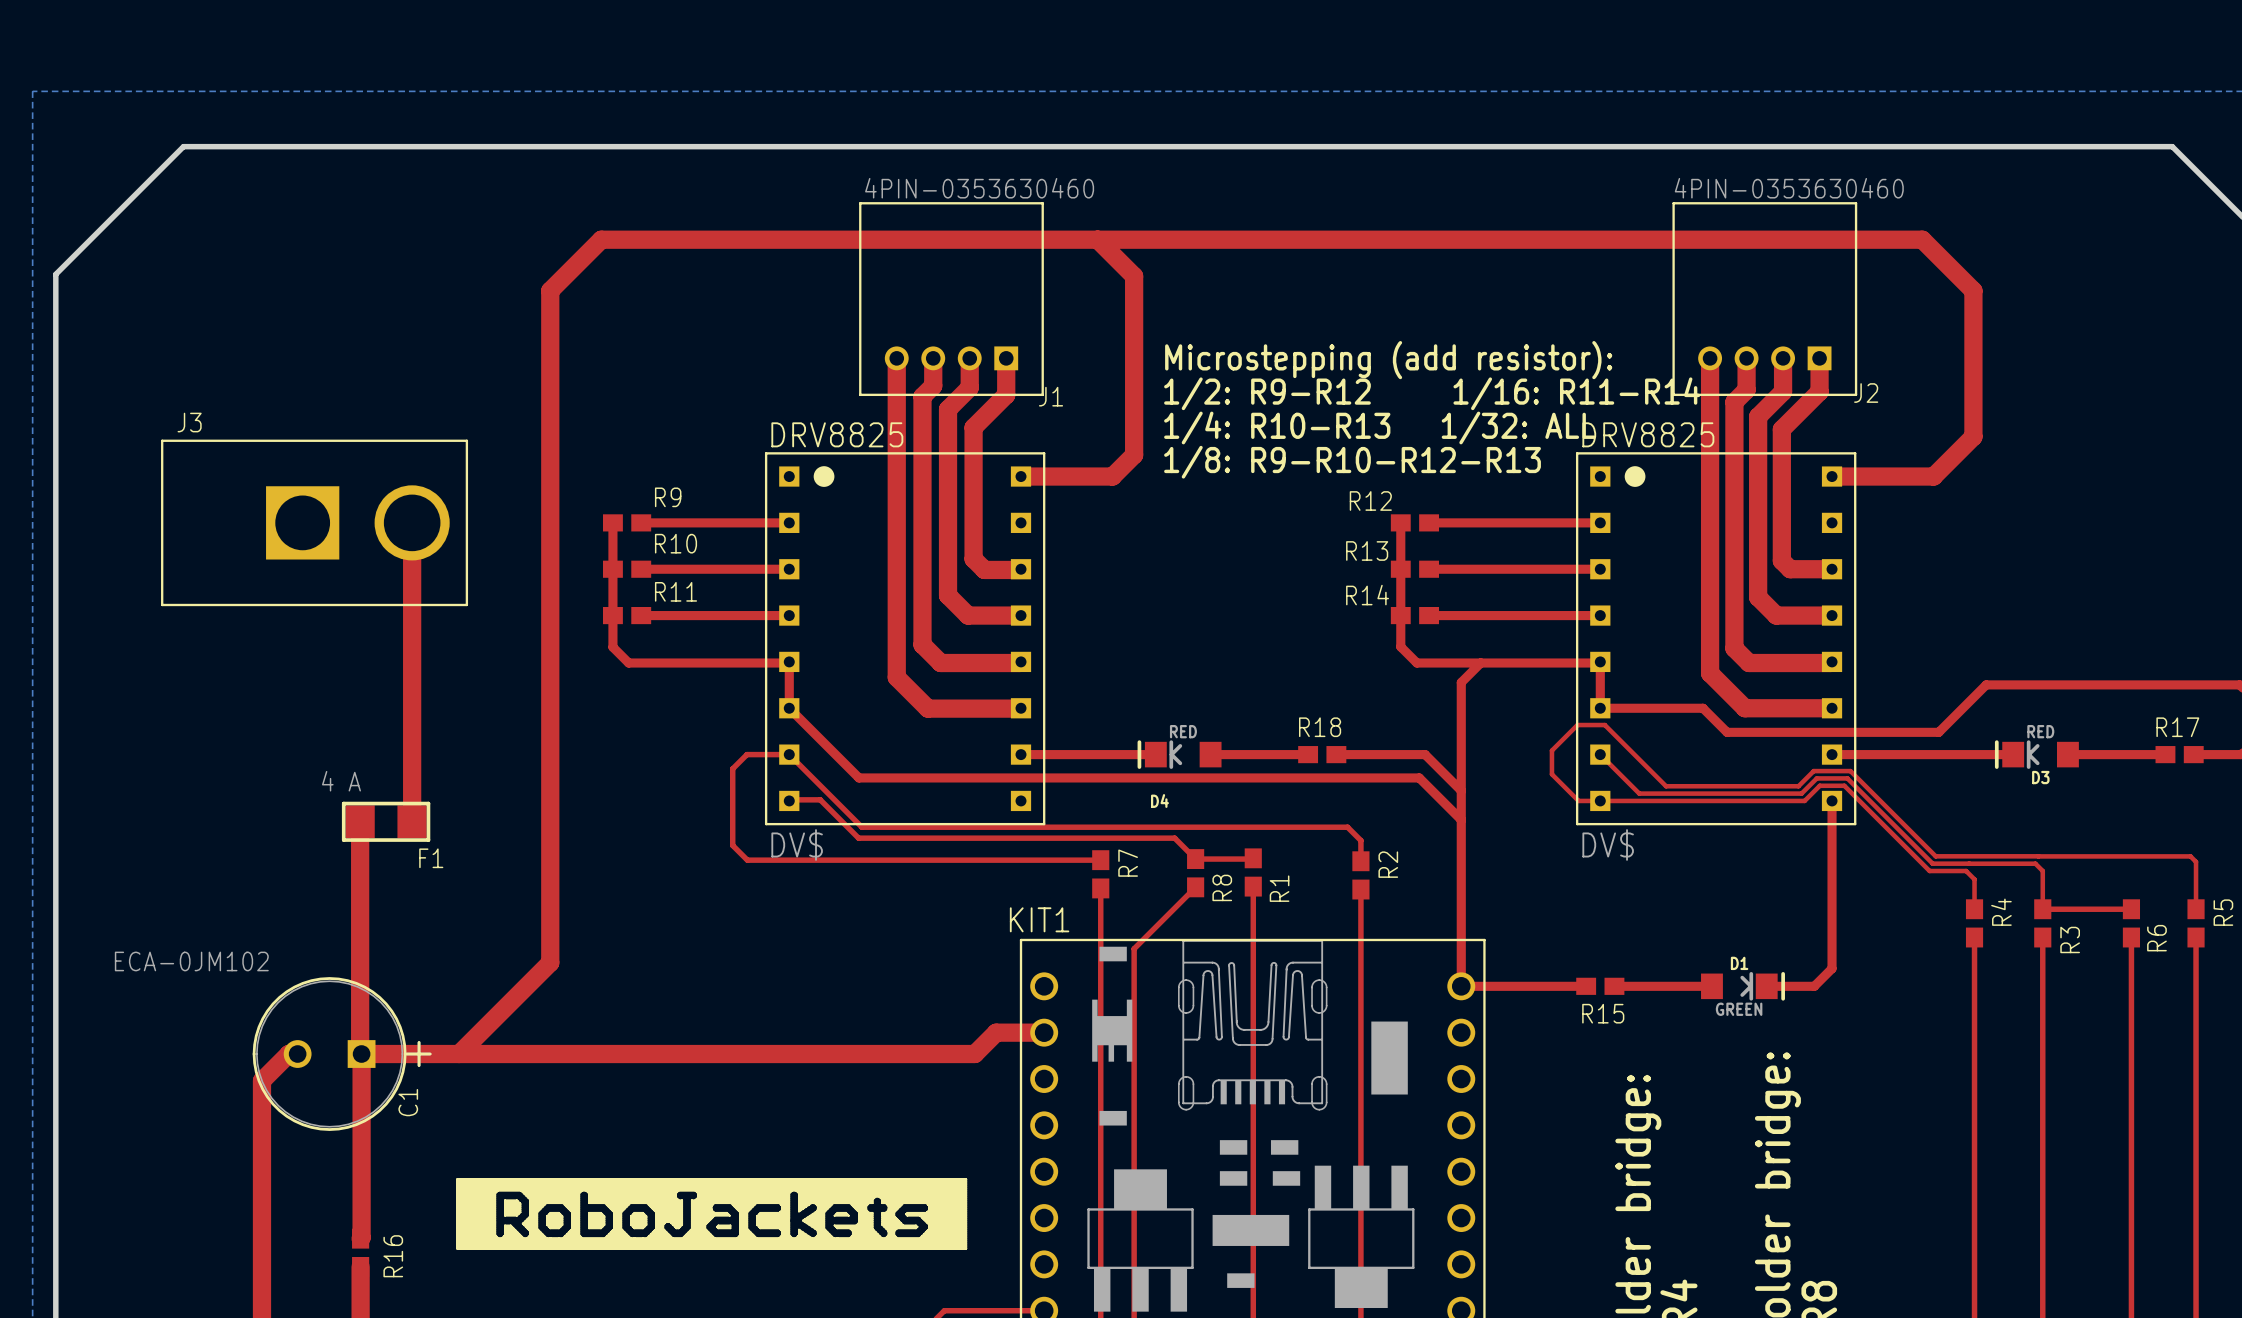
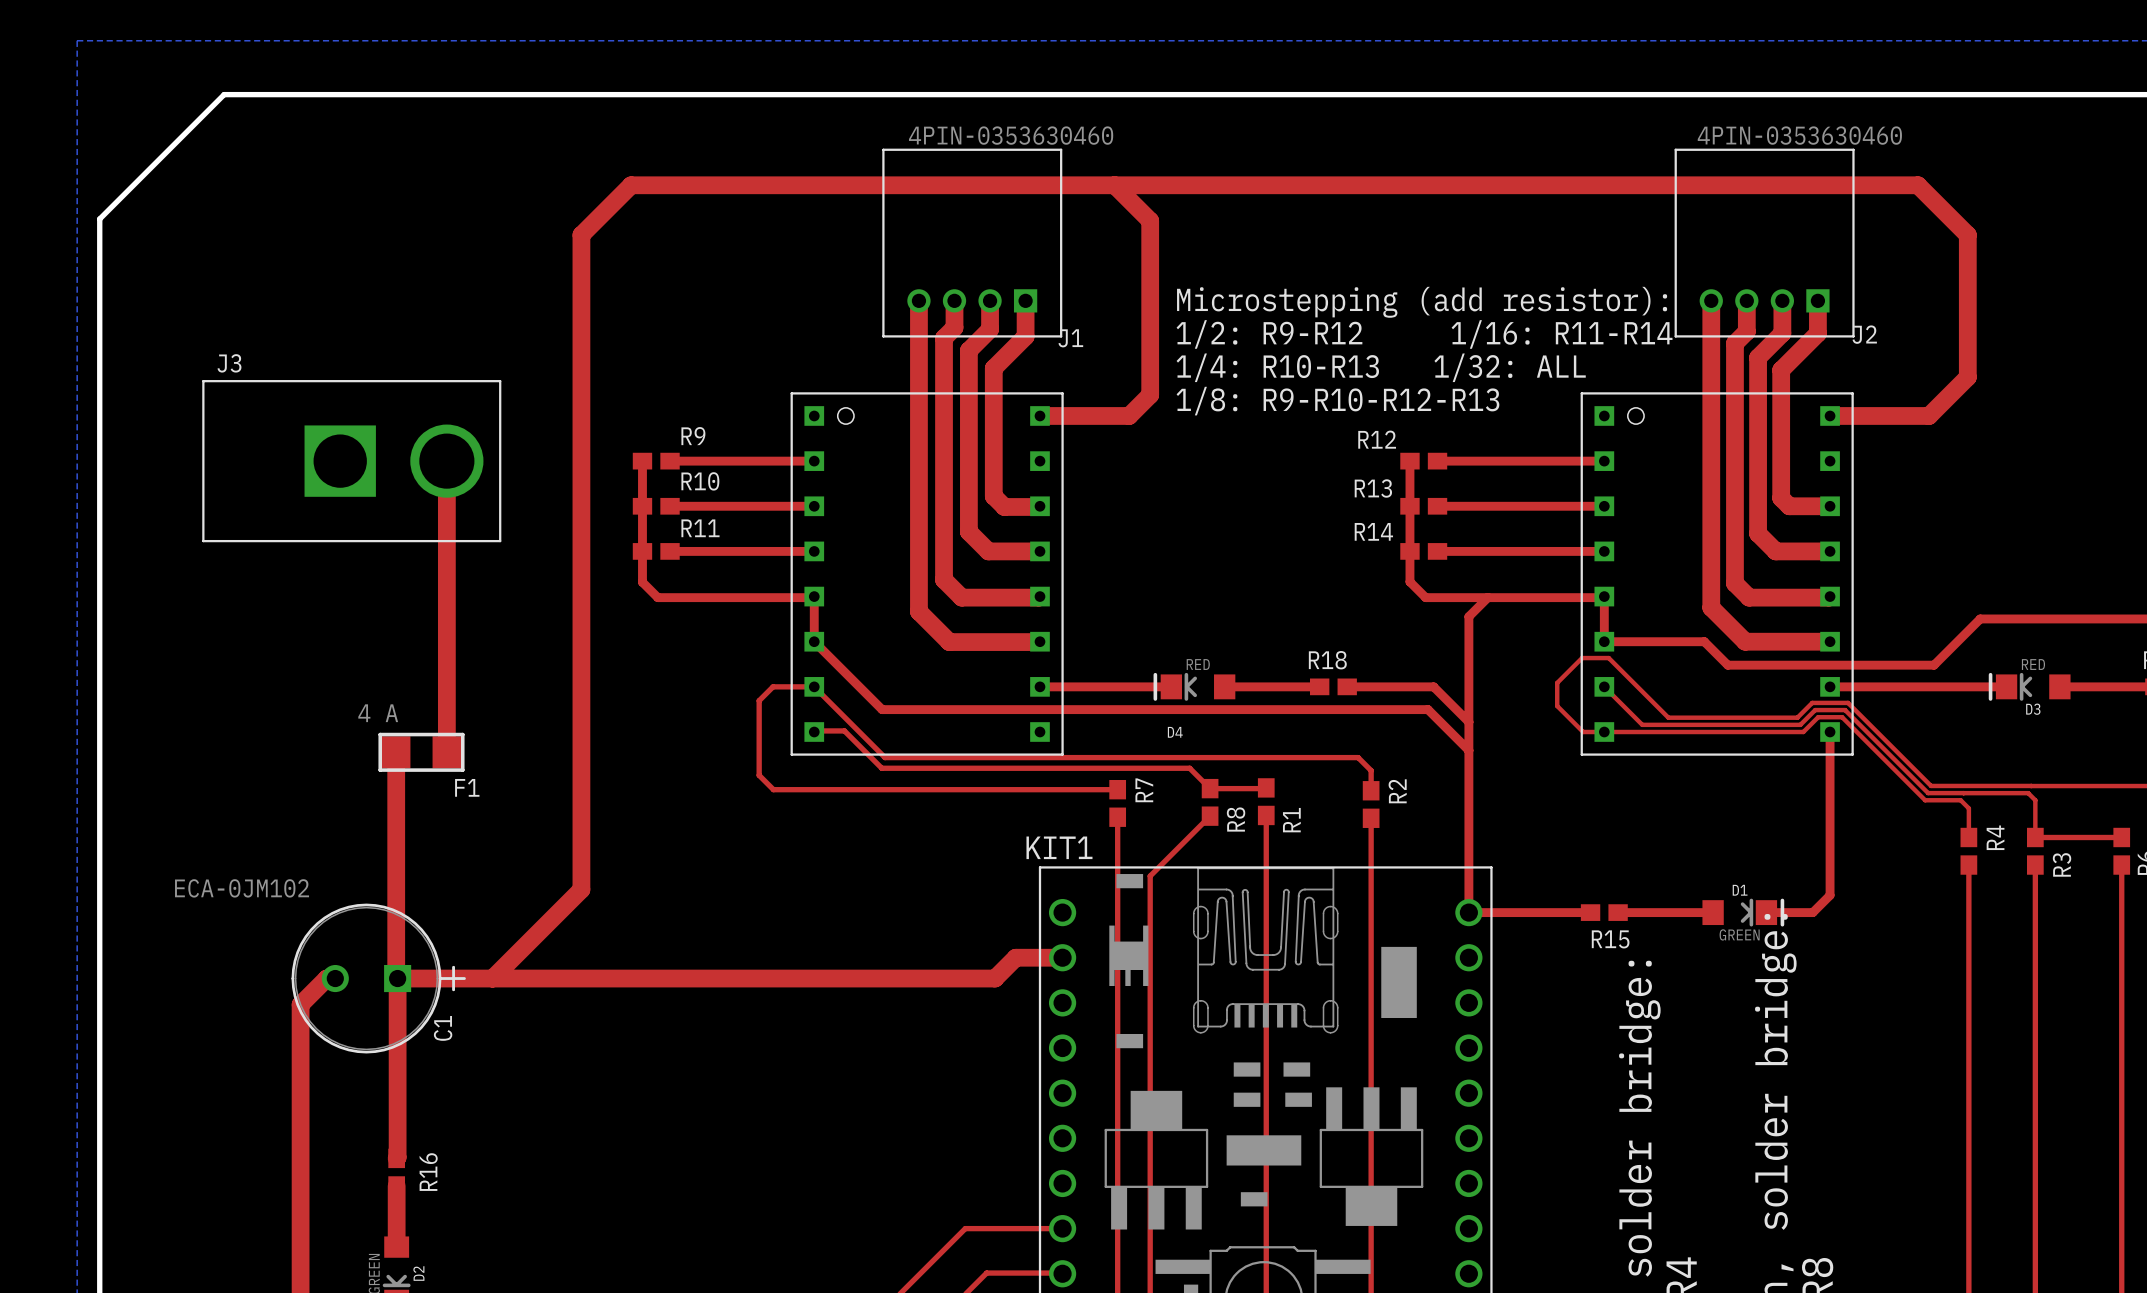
part footprint: [764, 452, 1046, 826] -> [790, 392, 1064, 756]
part footprint: [1575, 452, 1857, 826] -> [1580, 392, 1854, 756]
drawing: [456, 1178, 968, 1250] -> none

